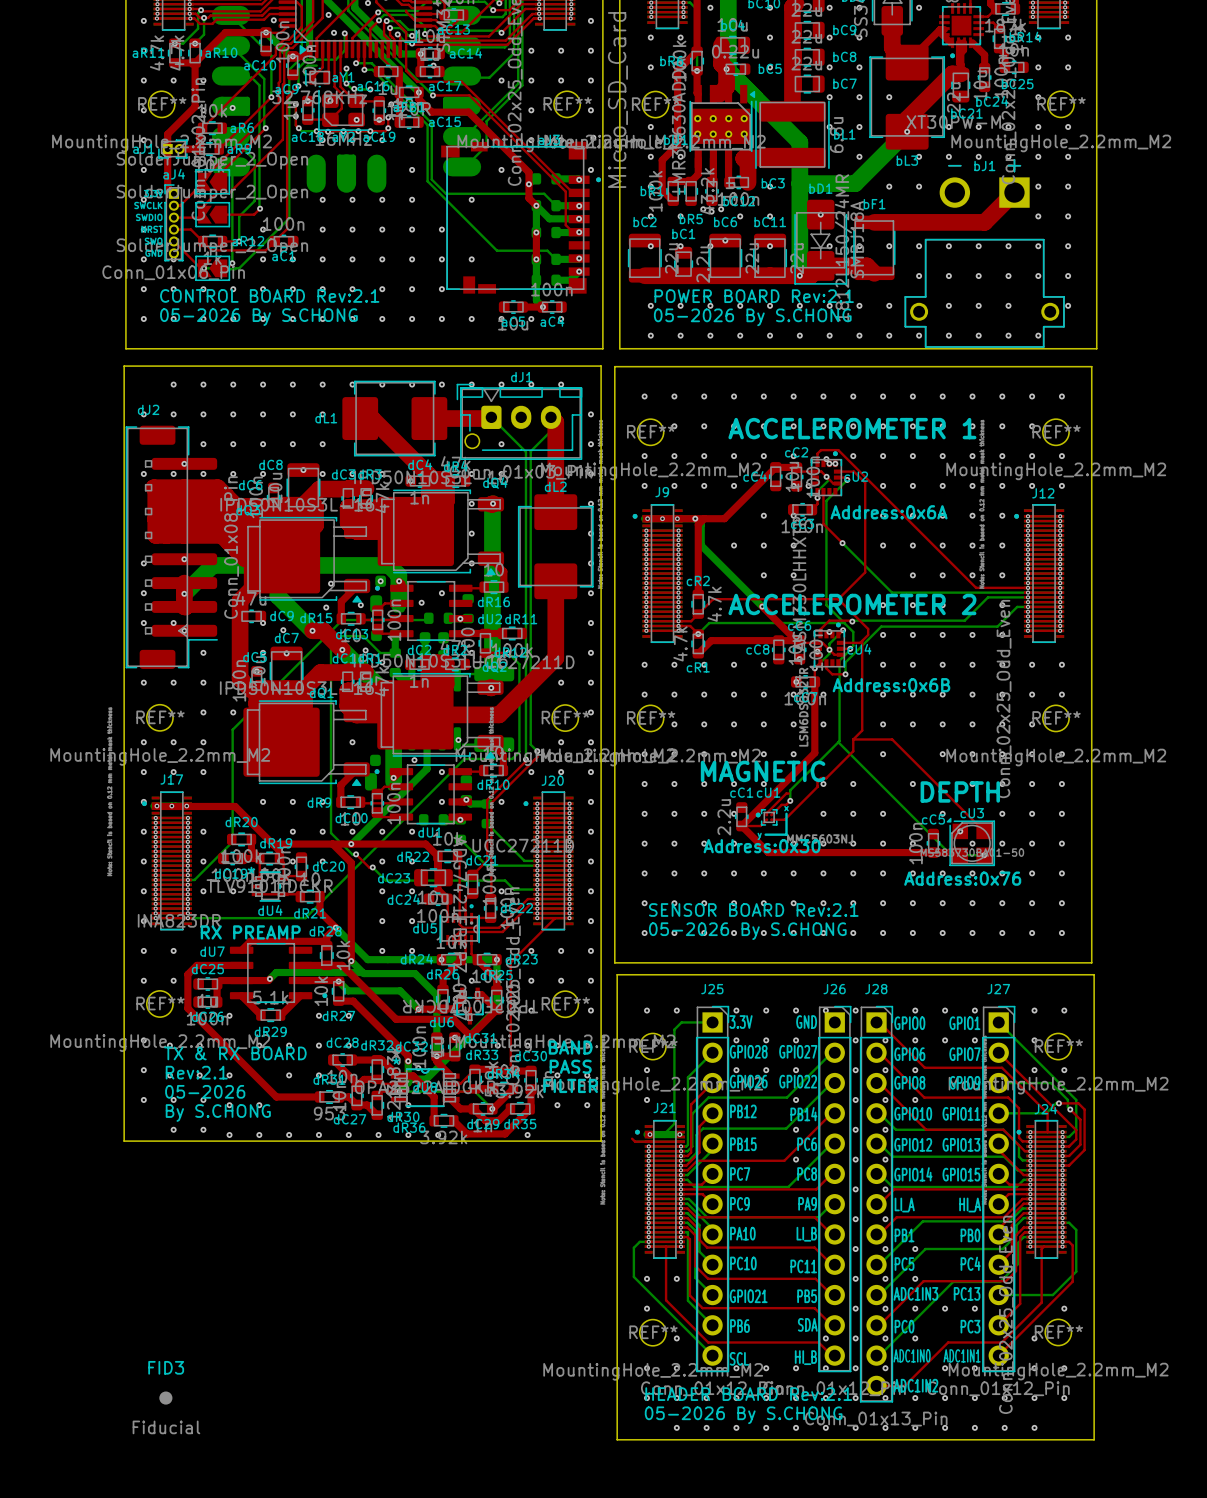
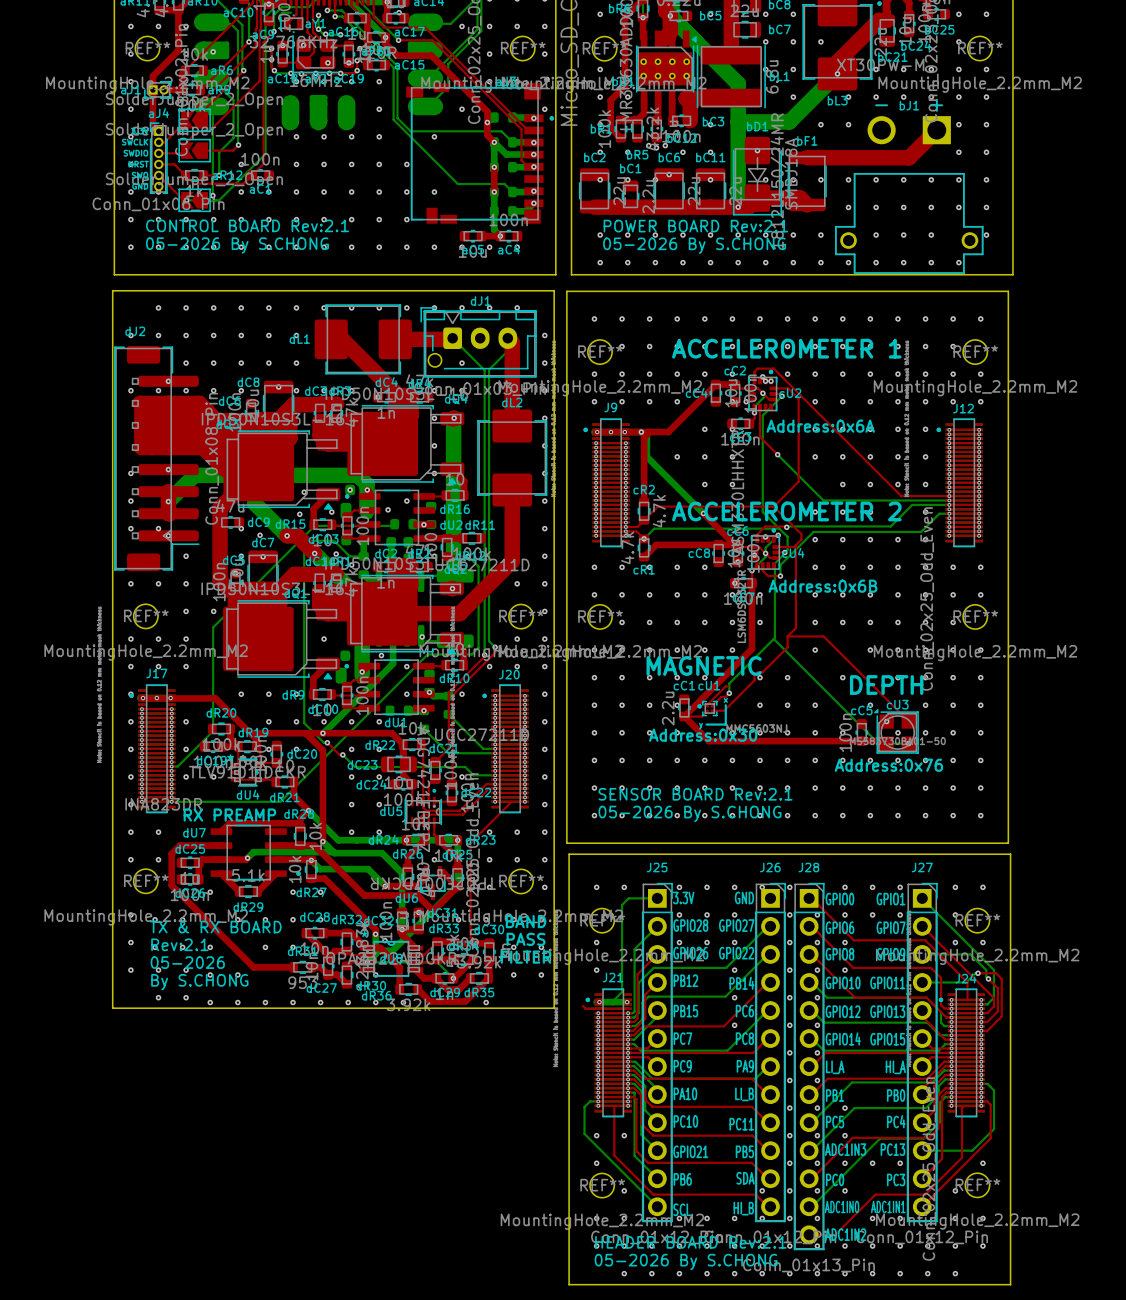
FID3: Fiducial (165, 1398) -> none

